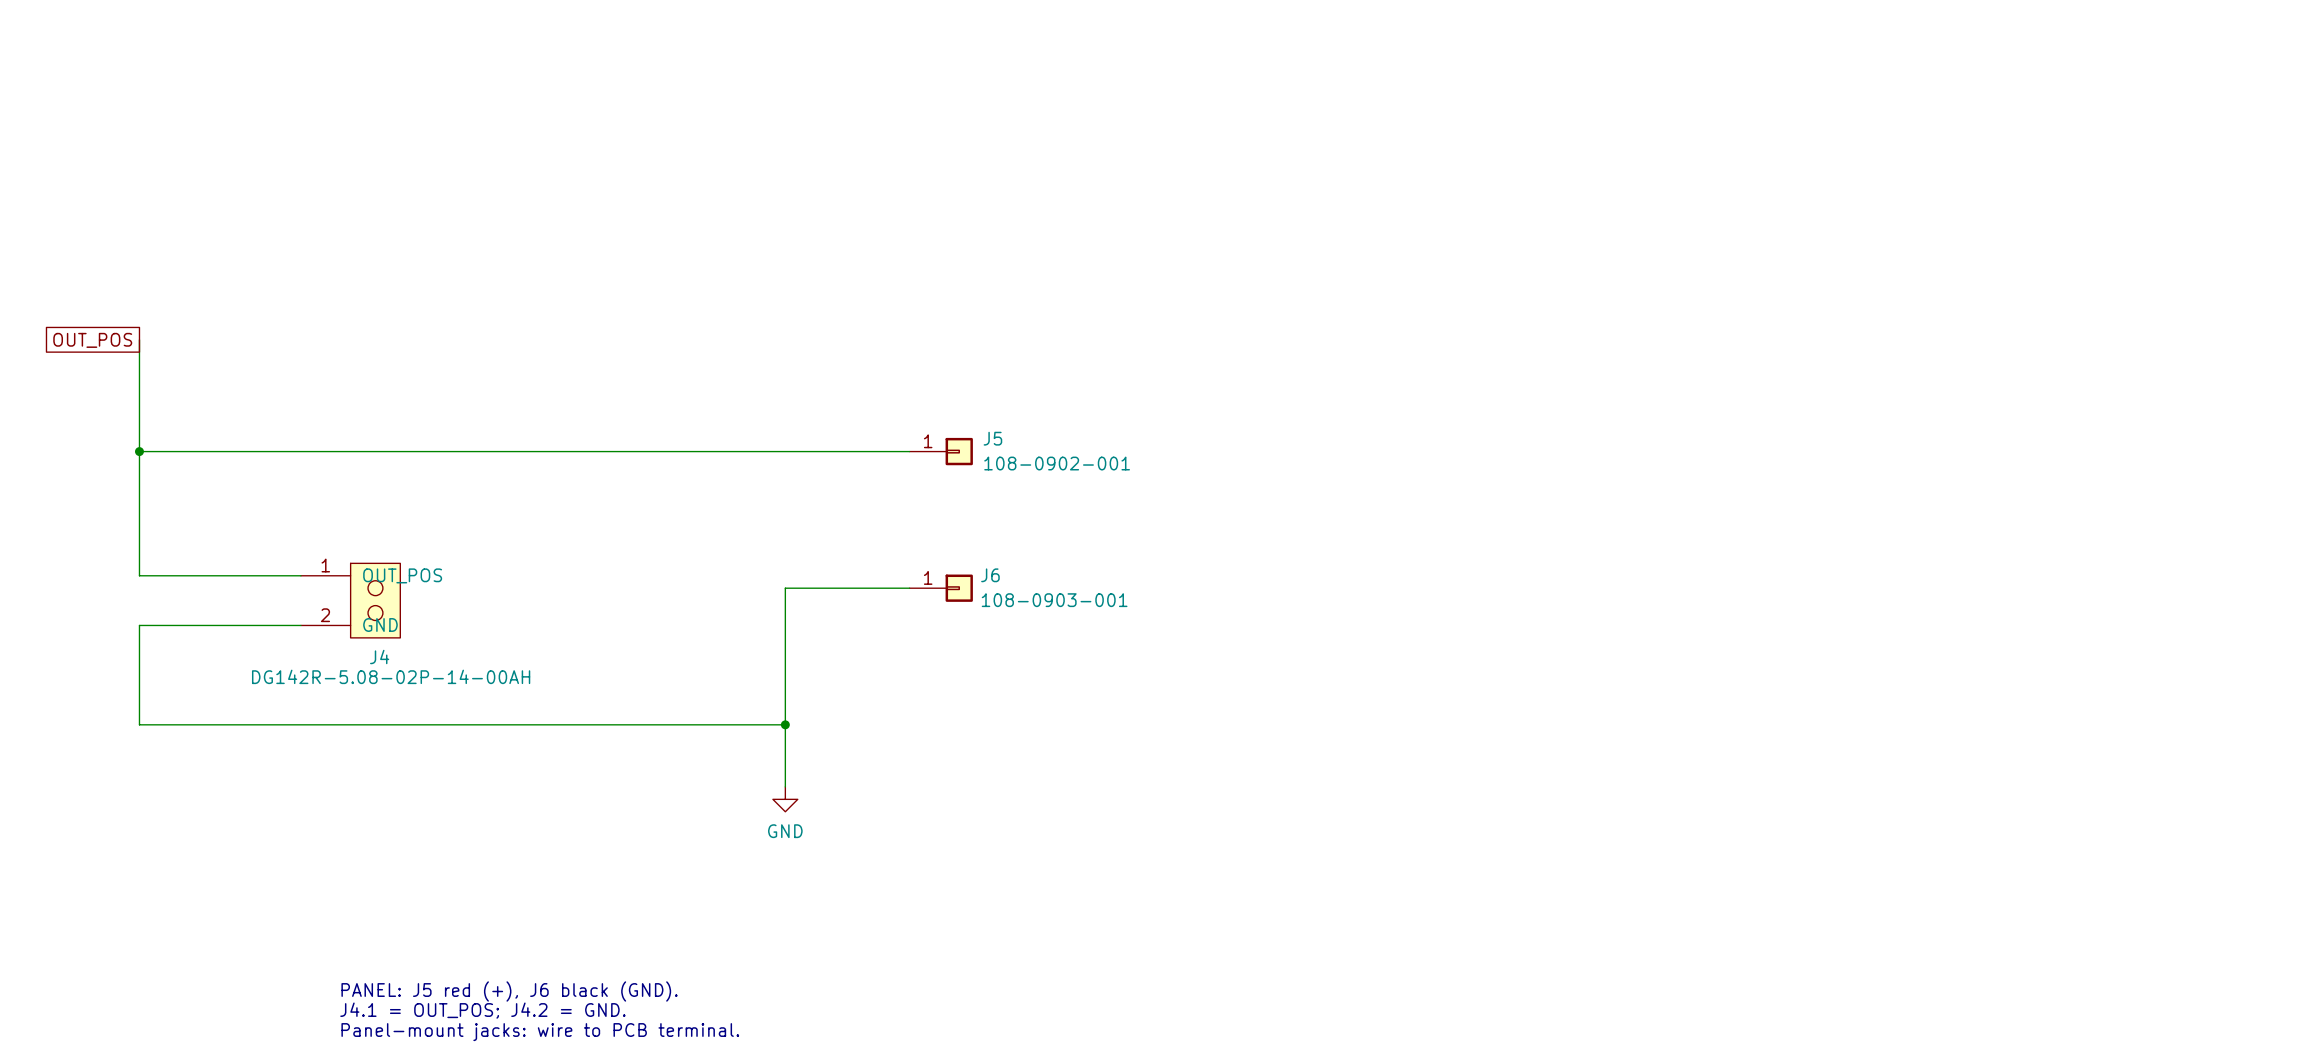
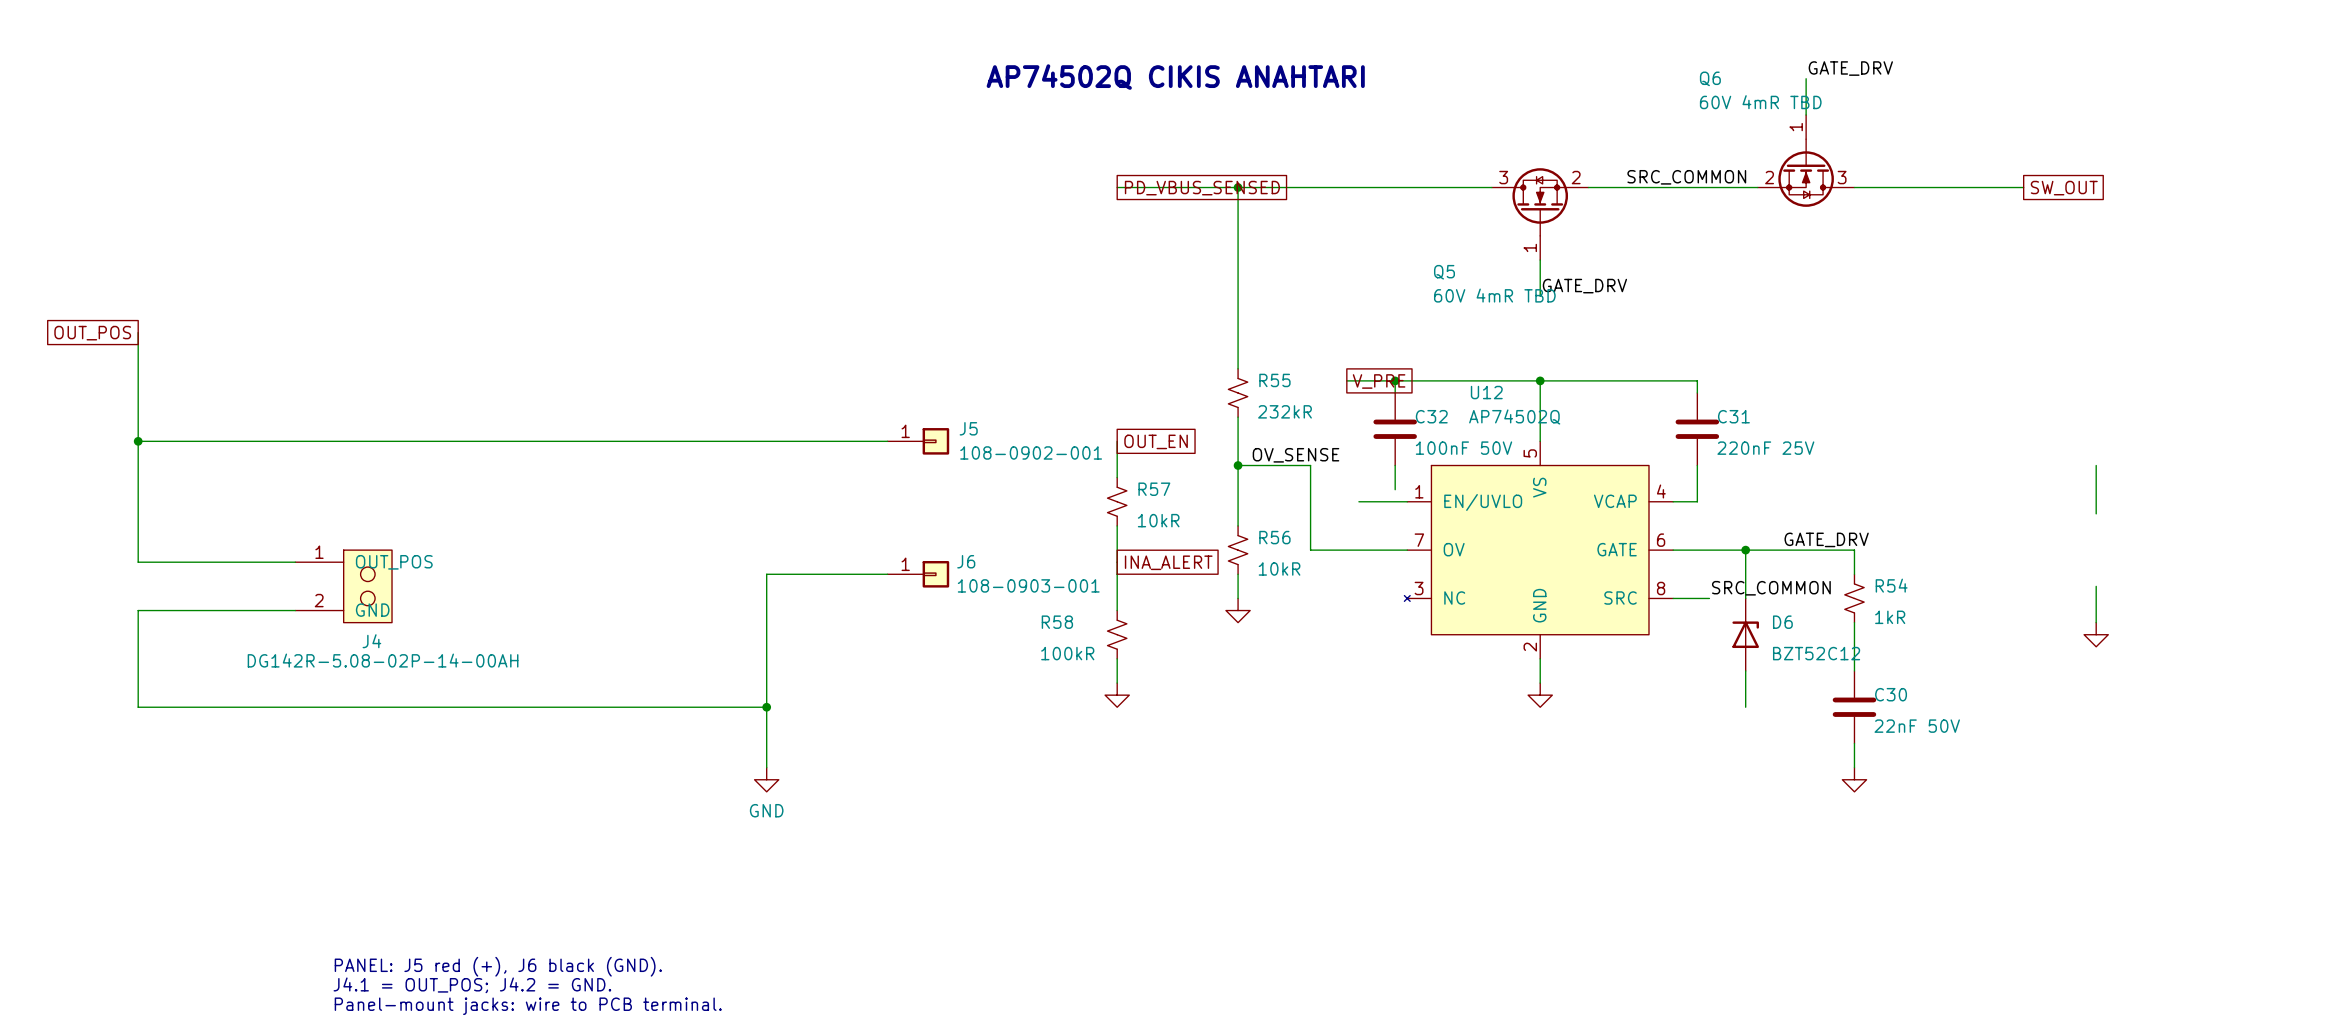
label: none -> GATE_DRV (1850, 68)
text: none -> AP74502Q CIKIS ANAHTARI (1175, 77)
wire: none -> (1806, 78) (1806, 115)
Q6: none -> 60V 4mR TBD (1806, 160)
label: none -> SRC_COMMON (1686, 177)
wire: none -> (1117, 187) (1491, 187)
wire: none -> (1238, 187) (1238, 368)
junction: none -> (1238, 187)
wire: none -> (1588, 187) (1757, 187)
wire: none -> (1854, 187) (2023, 187)
global label: none -> PD_VBUS_SENSED (1202, 188)
global label: none -> SW_OUT (2064, 188)
Q5: none -> 60V 4mR TBD (1540, 214)
wire: none -> (1540, 260) (1540, 296)
label: none -> GATE_DRV (1584, 286)
wire: none -> (1346, 380) (1697, 380) (1697, 392)
wire: none -> (1395, 380) (1395, 392)
junction: none -> (1395, 380)
wire: none -> (1540, 380) (1540, 441)
junction: none -> (1540, 380)
global label: none -> V_PRE (1379, 381)
R55: none -> 232kR (1238, 392)
wire: none -> (1238, 417) (1238, 525)
C32: none -> 100nF 50V (1395, 429)
C31: none -> 220nF 25V (1697, 429)
wire: none -> (1117, 441) (1117, 477)
global label: none -> OUT_EN (1156, 441)
label: none -> OV_SENSE (1295, 455)
wire: none -> (1238, 465) (1310, 465) (1310, 550) (1407, 550)
junction: none -> (1238, 465)
wire: none -> (1395, 465) (1395, 489)
wire: none -> (1697, 465) (1697, 501) (1673, 501)
wire: none -> (2096, 465) (2096, 513)
R57: none -> 10kR (1117, 501)
wire: none -> (1358, 501) (1407, 501)
wire: none -> (1117, 525) (1117, 610)
label: none -> GATE_DRV (1826, 539)
R56: none -> 10kR (1238, 550)
U12: none -> AP74502Q (1538, 550)
wire: none -> (1673, 550) (1854, 550) (1854, 574)
wire: none -> (1745, 550) (1745, 598)
junction: none -> (1745, 550)
global label: none -> INA_ALERT (1168, 562)
wire: none -> (1238, 574) (1238, 598)
wire: none -> (2096, 586) (2096, 622)
label: none -> SRC_COMMON (1771, 588)
wire: none -> (1673, 598) (1709, 598)
R54: none -> 1kR (1854, 598)
power symbol: none -> (1238, 610)
wire: none -> (1854, 622) (1854, 670)
R58: none -> 100kR (1117, 634)
D6: none -> BZT52C12 (1745, 634)
power symbol: none -> (2096, 634)
wire: none -> (1117, 658) (1117, 683)
wire: none -> (1540, 658) (1540, 683)
wire: none -> (1745, 670) (1745, 707)
power symbol: none -> (1117, 695)
power symbol: none -> (1540, 695)
C30: none -> 22nF 50V (1854, 707)
wire: none -> (1854, 743) (1854, 767)
power symbol: none -> (1854, 779)

